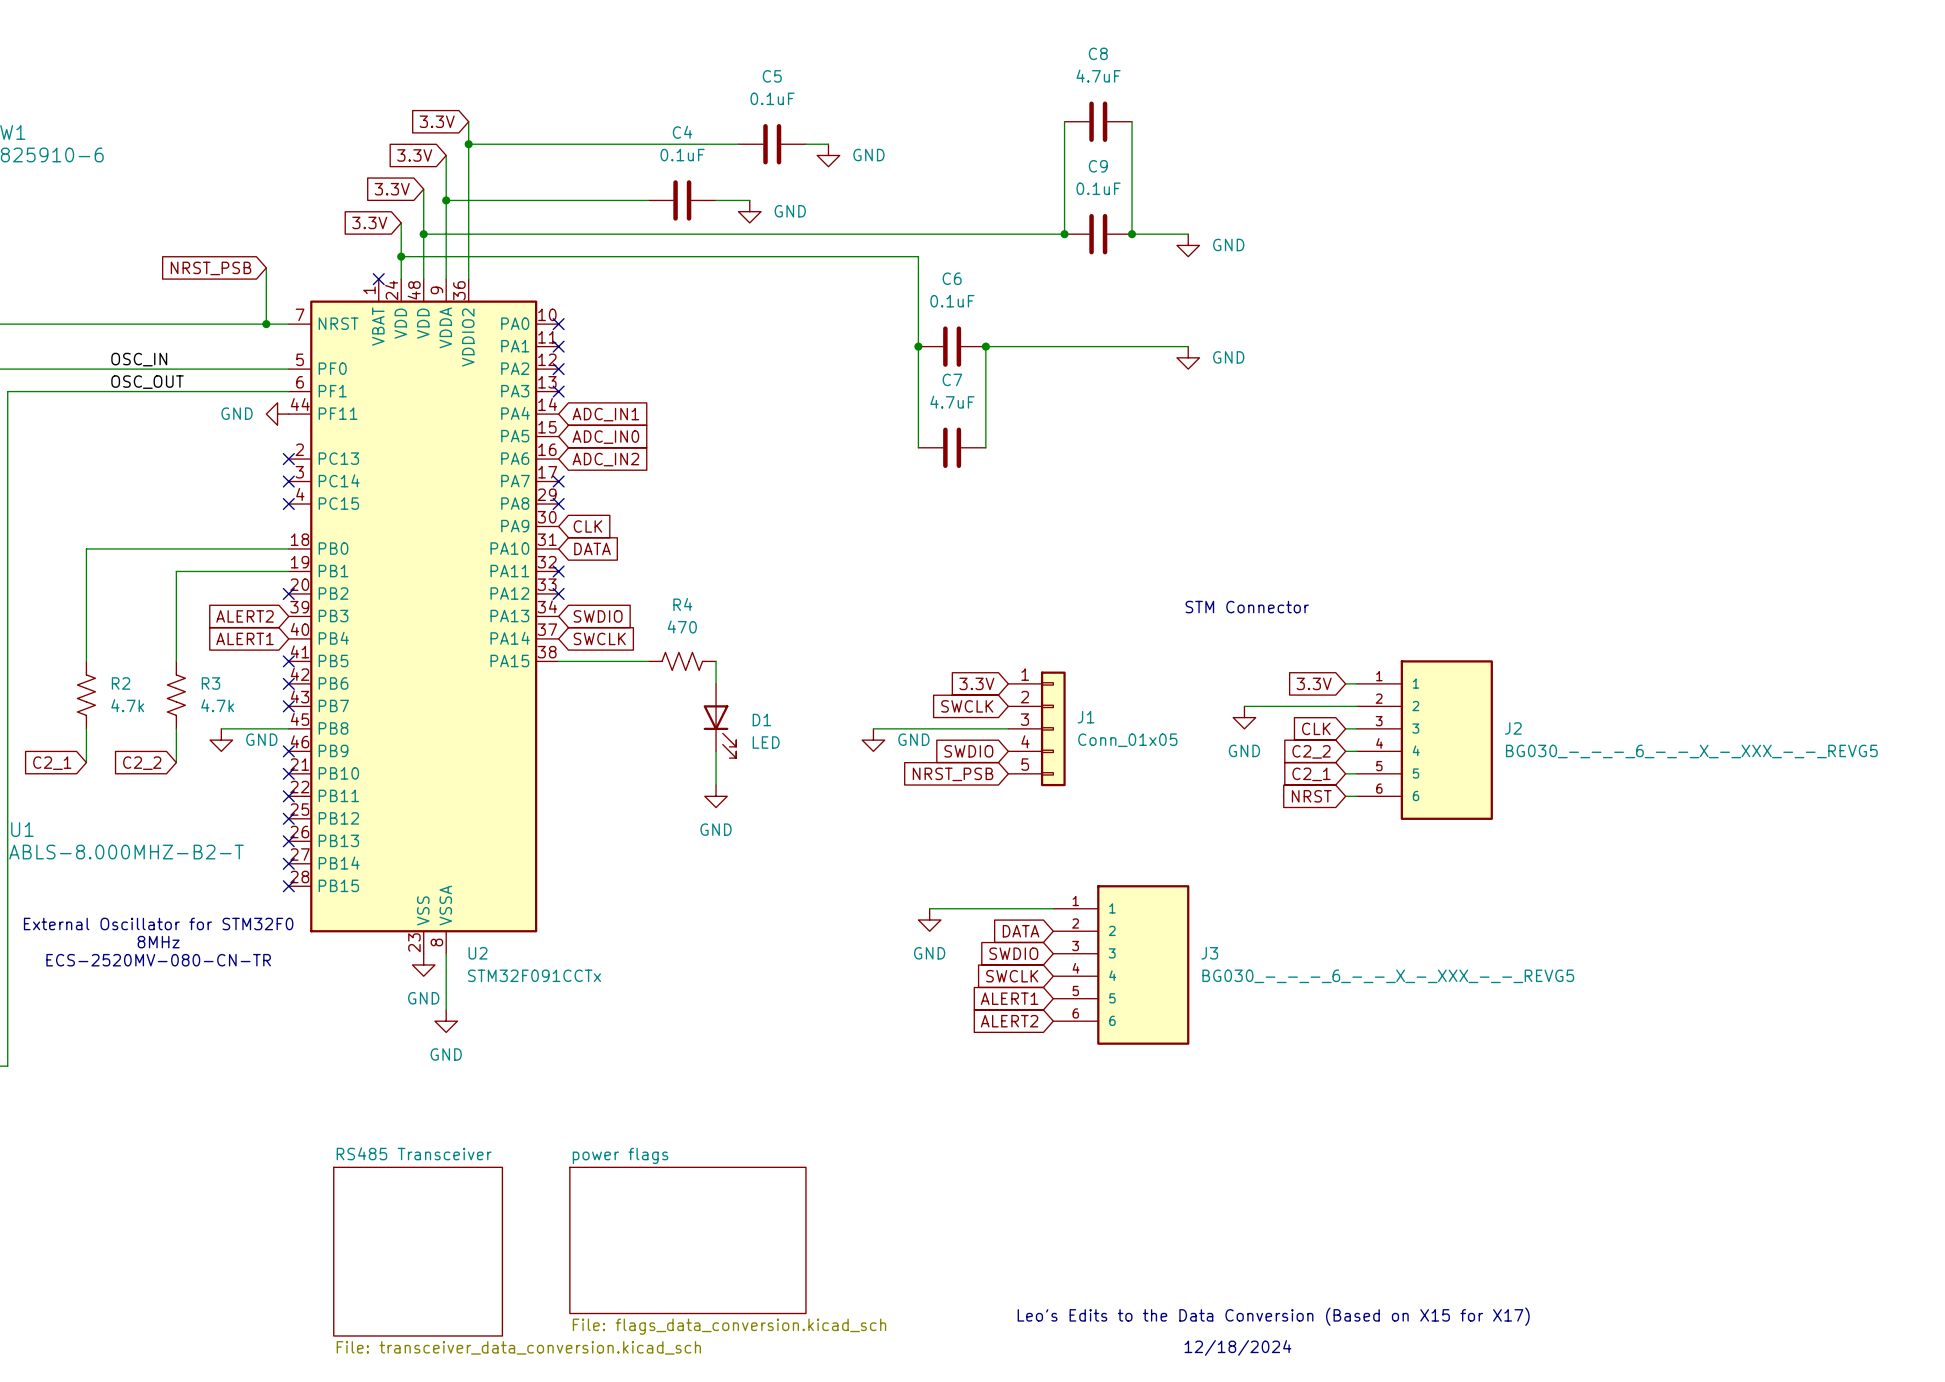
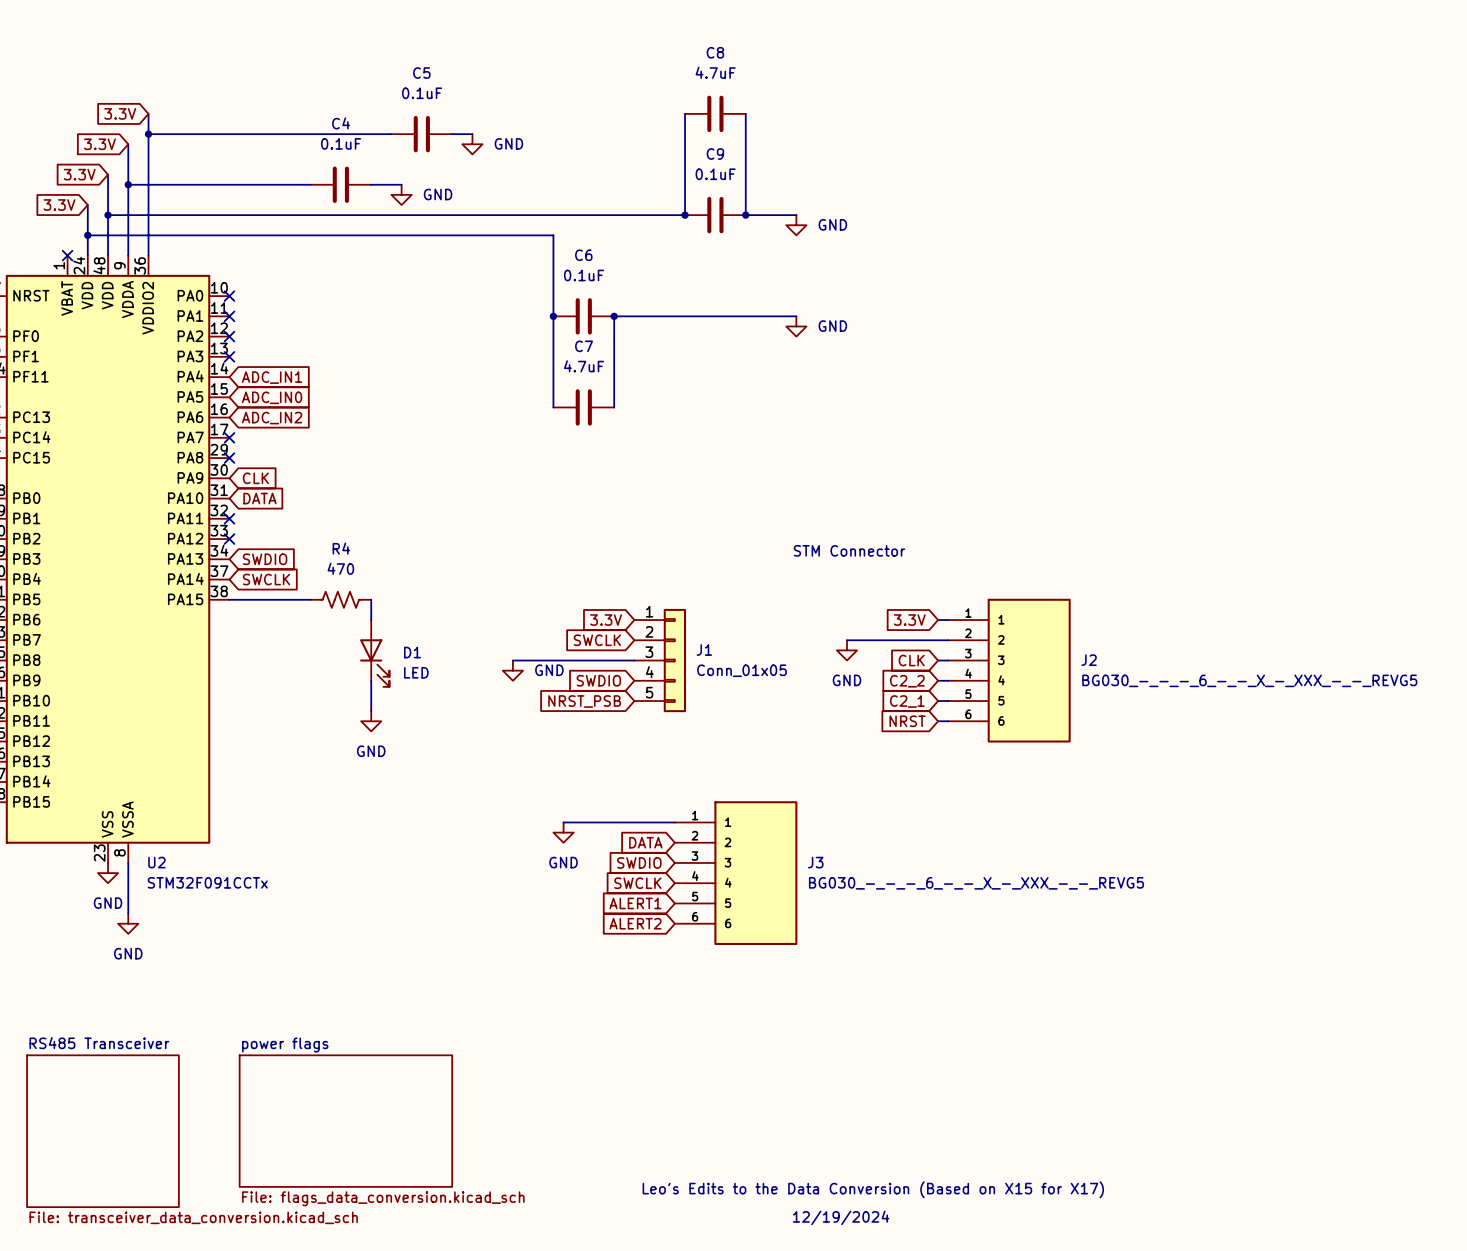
text: 12/18/2024 (1237, 1347) -> 12/19/2024 (841, 1217)

